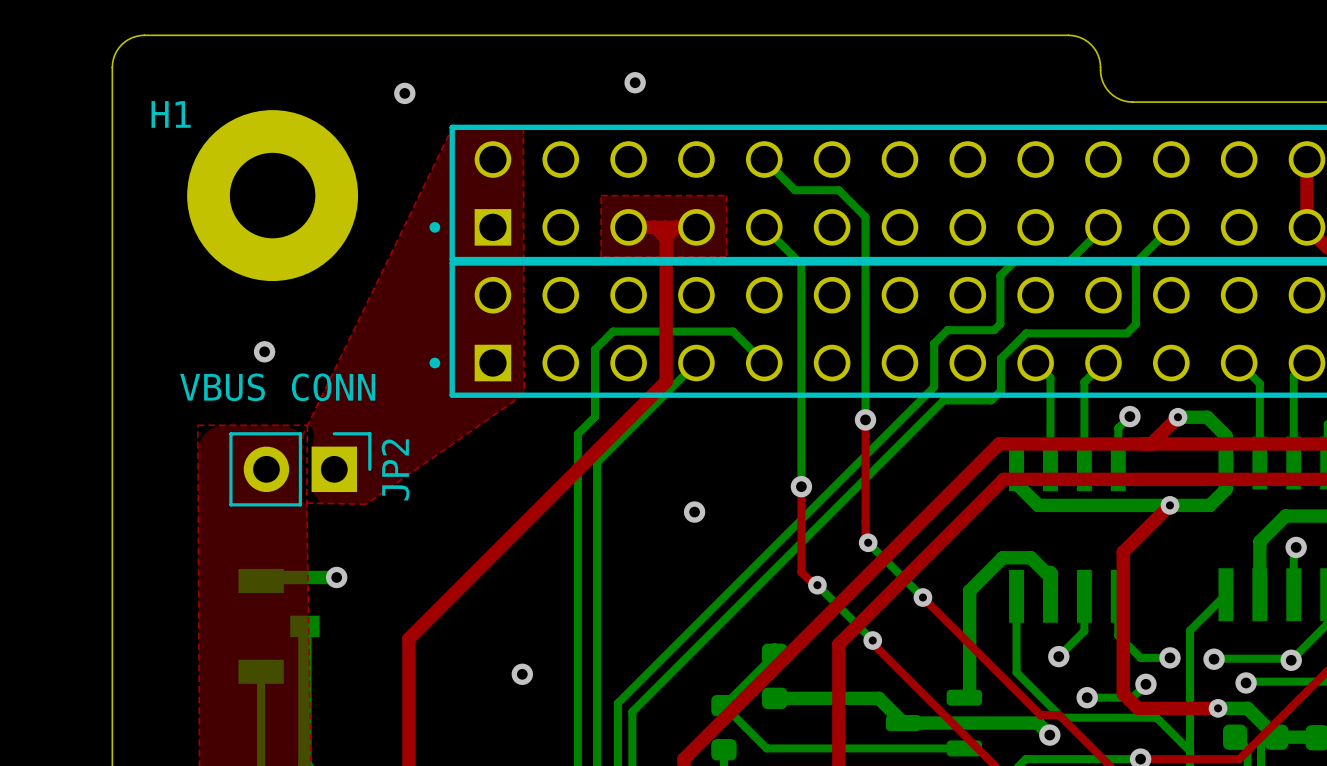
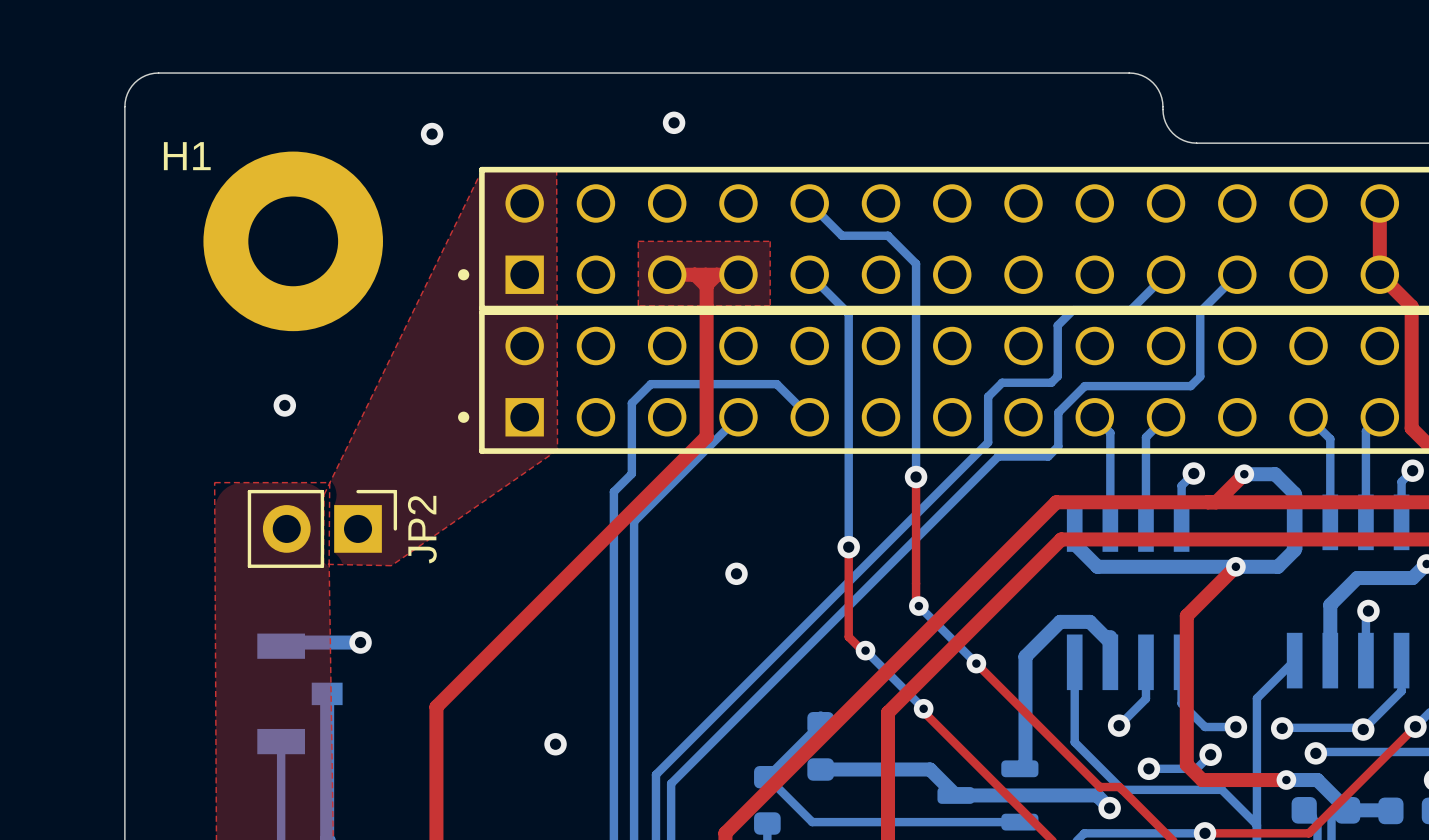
text: VBUS CONN (277, 387) -> none

